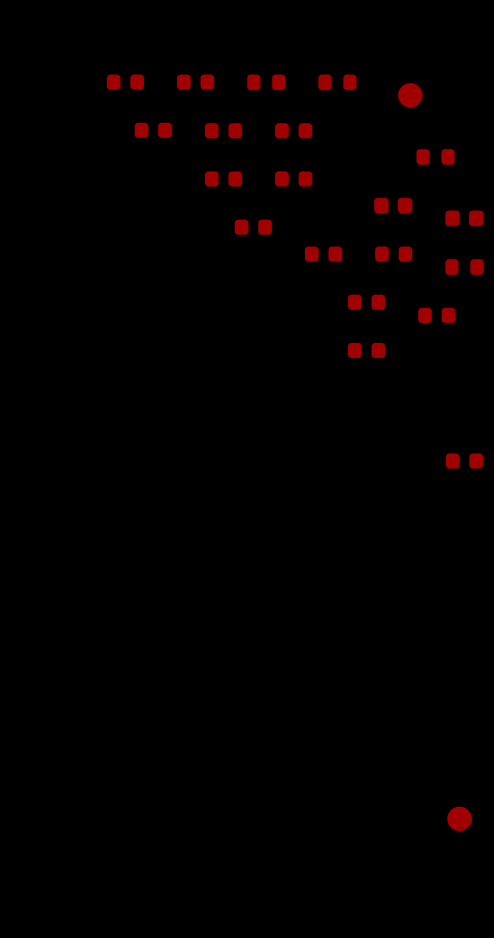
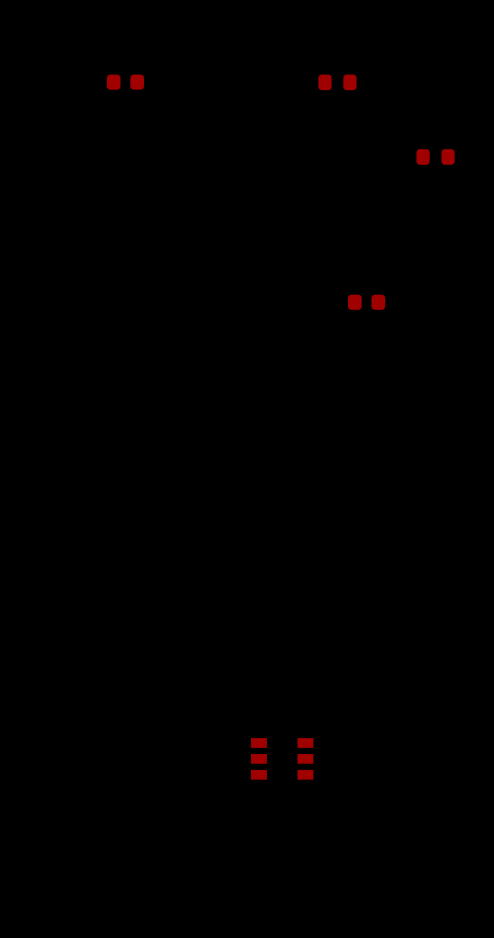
part: (195, 82) -> none
part: (266, 82) -> none
part: (410, 95) -> none
part: (153, 130) -> none
part: (223, 130) -> none
part: (293, 130) -> none
part: (223, 178) -> none
part: (293, 178) -> none
part: (393, 205) -> none
part: (464, 218) -> none
part: (253, 227) -> none
part: (323, 254) -> none
part: (393, 254) -> none
part: (464, 267) -> none
part: (436, 315) -> none
part: (366, 350) -> none
part: (464, 460) -> none
part: none -> (282, 758)
part: (459, 818) -> none

